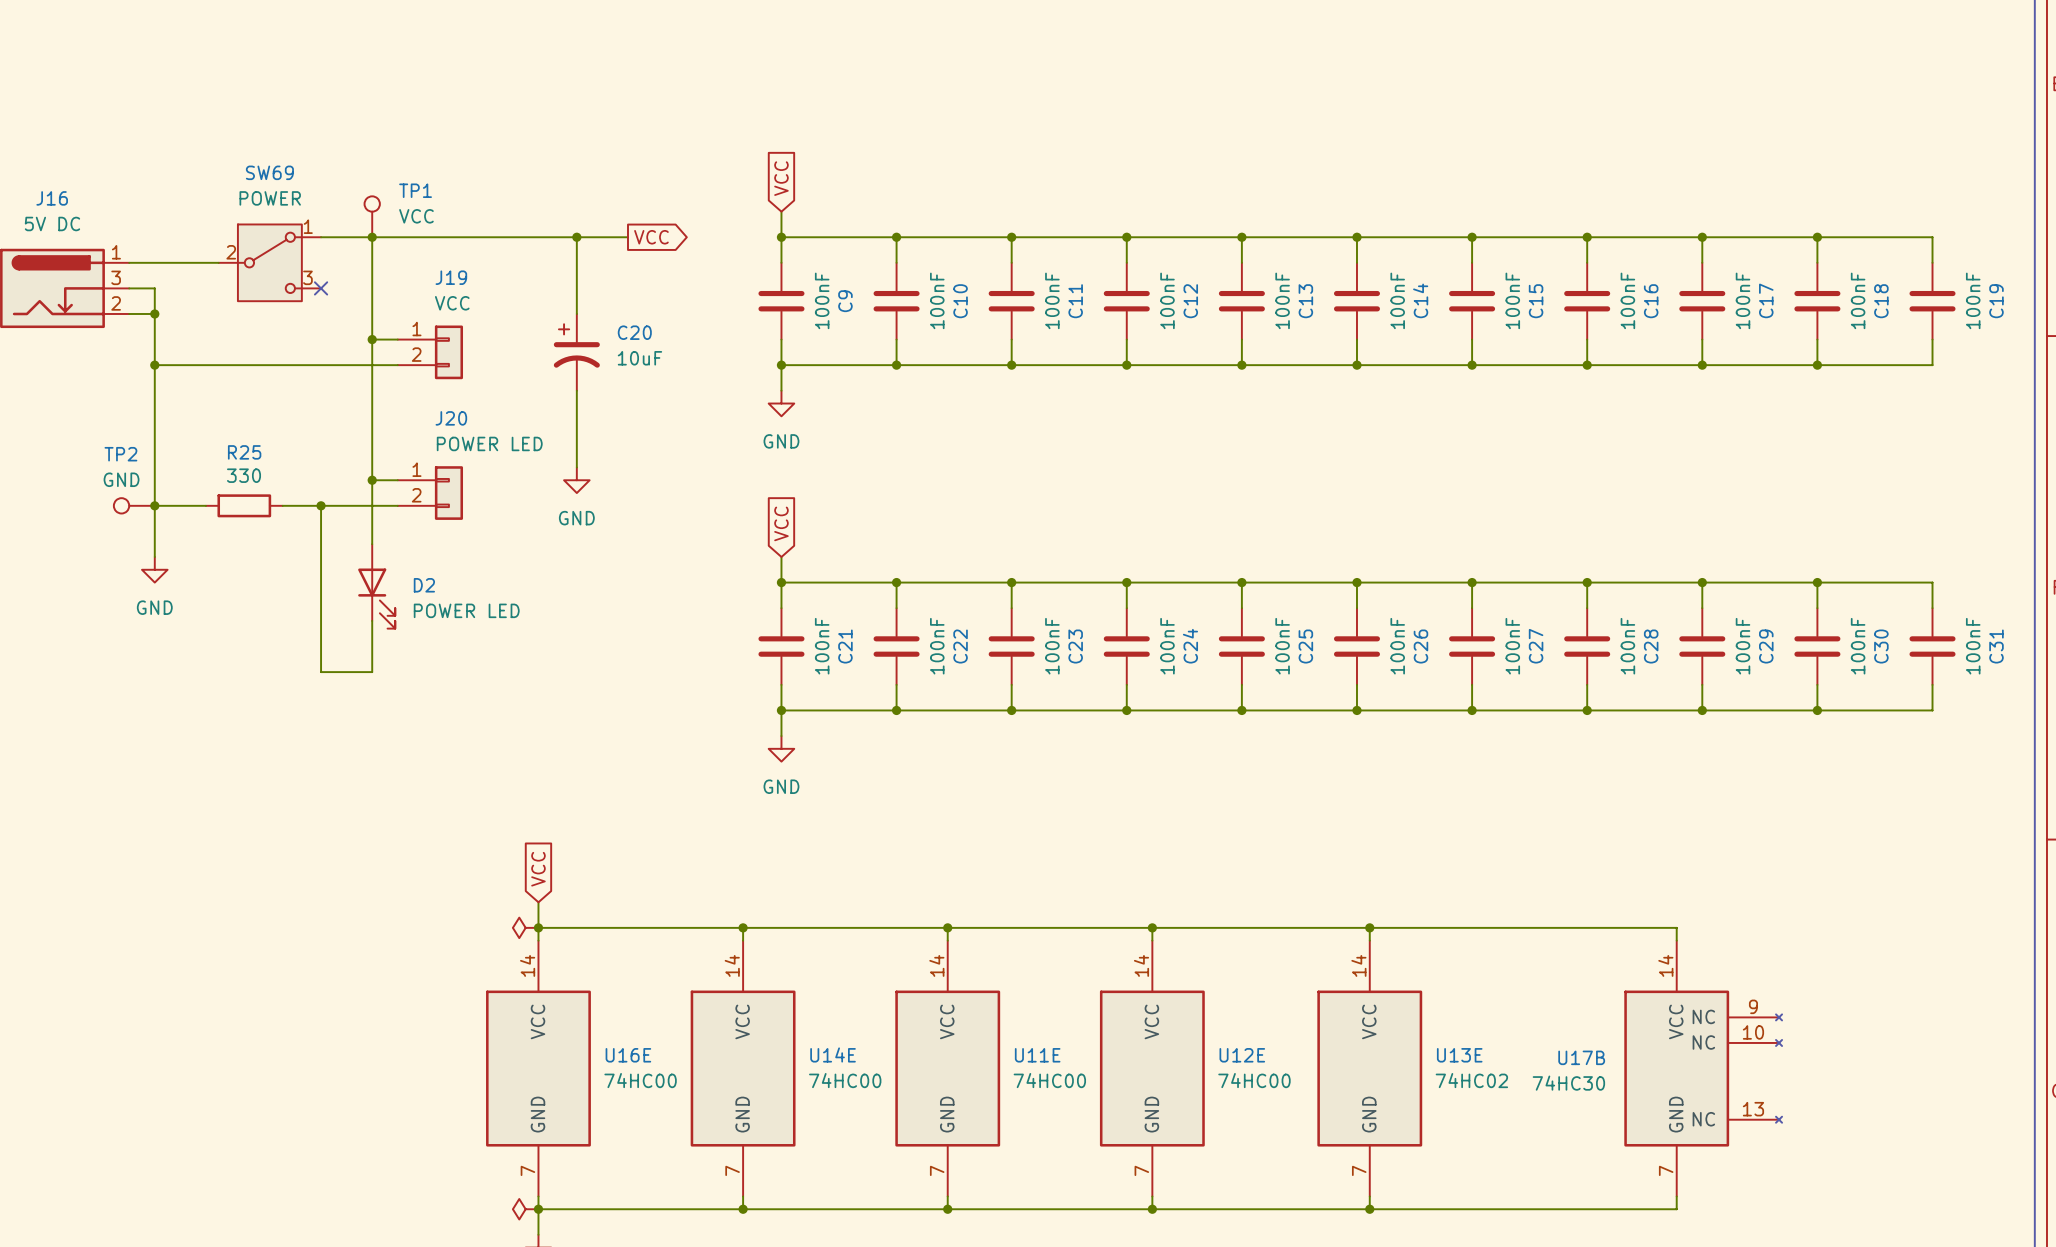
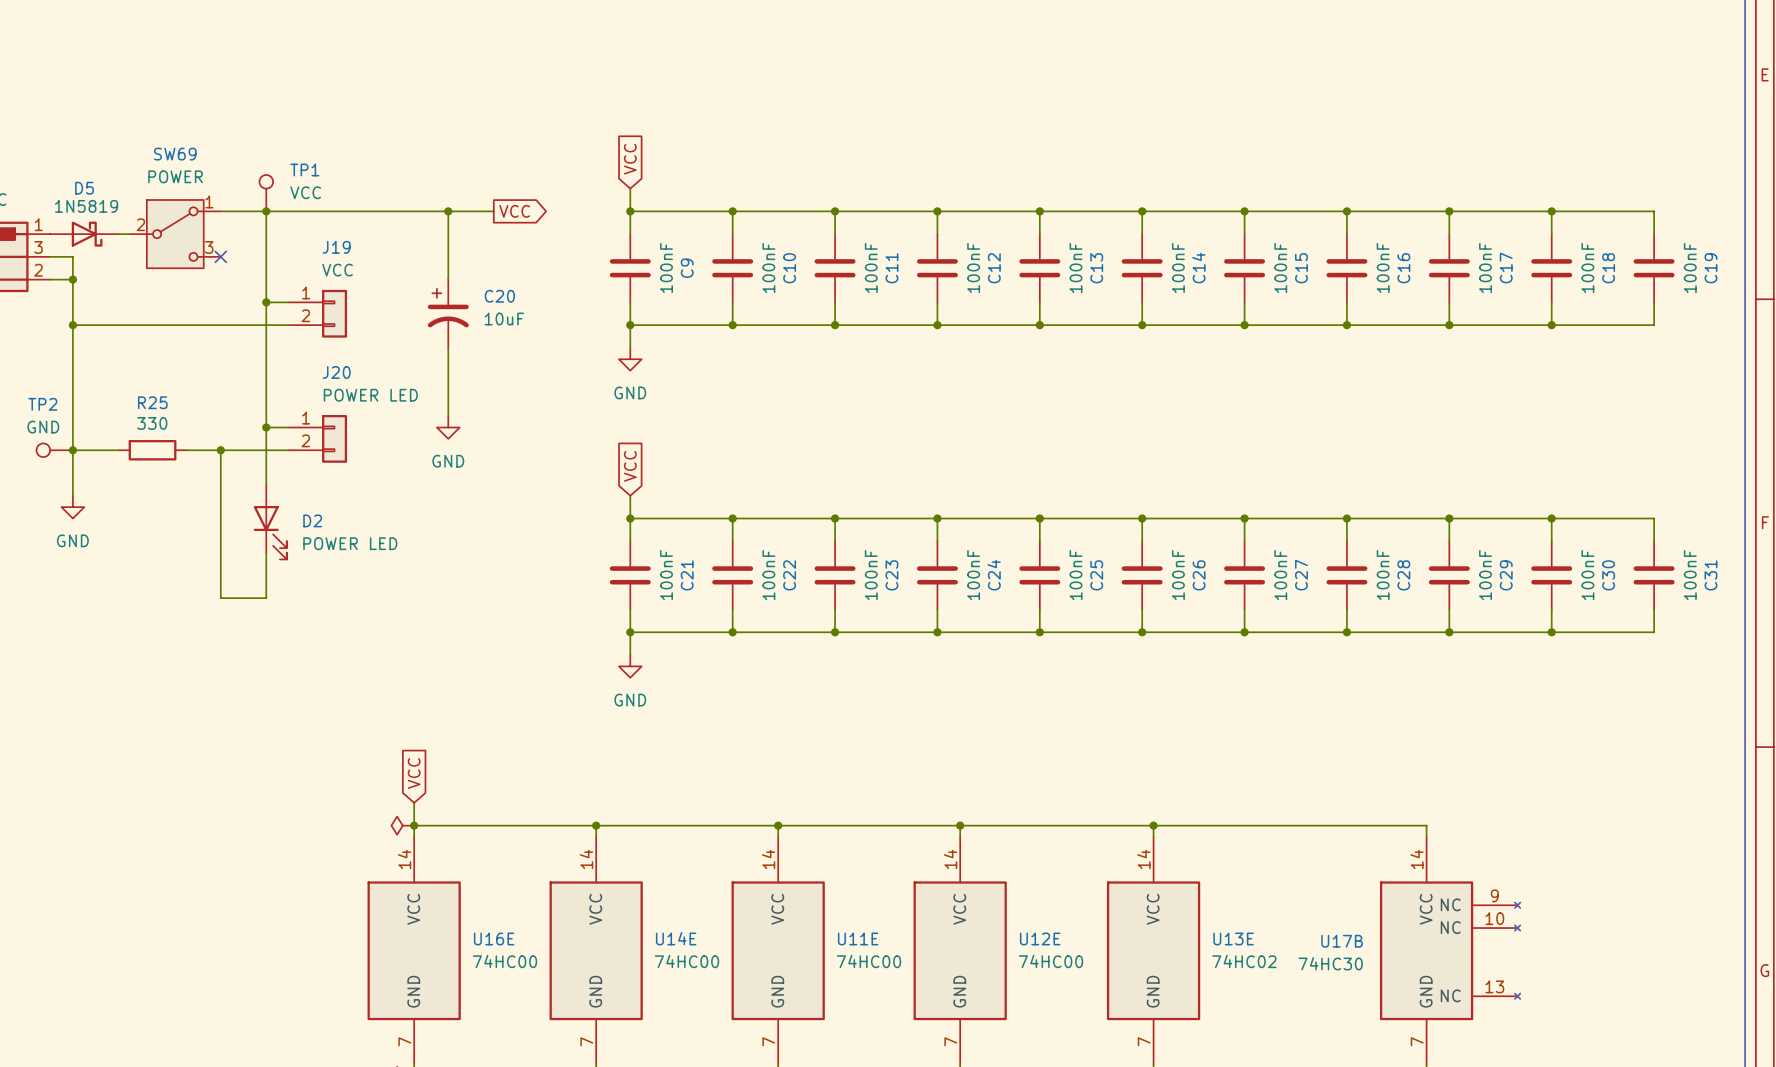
D5: none -> 1N5819 (84, 234)

